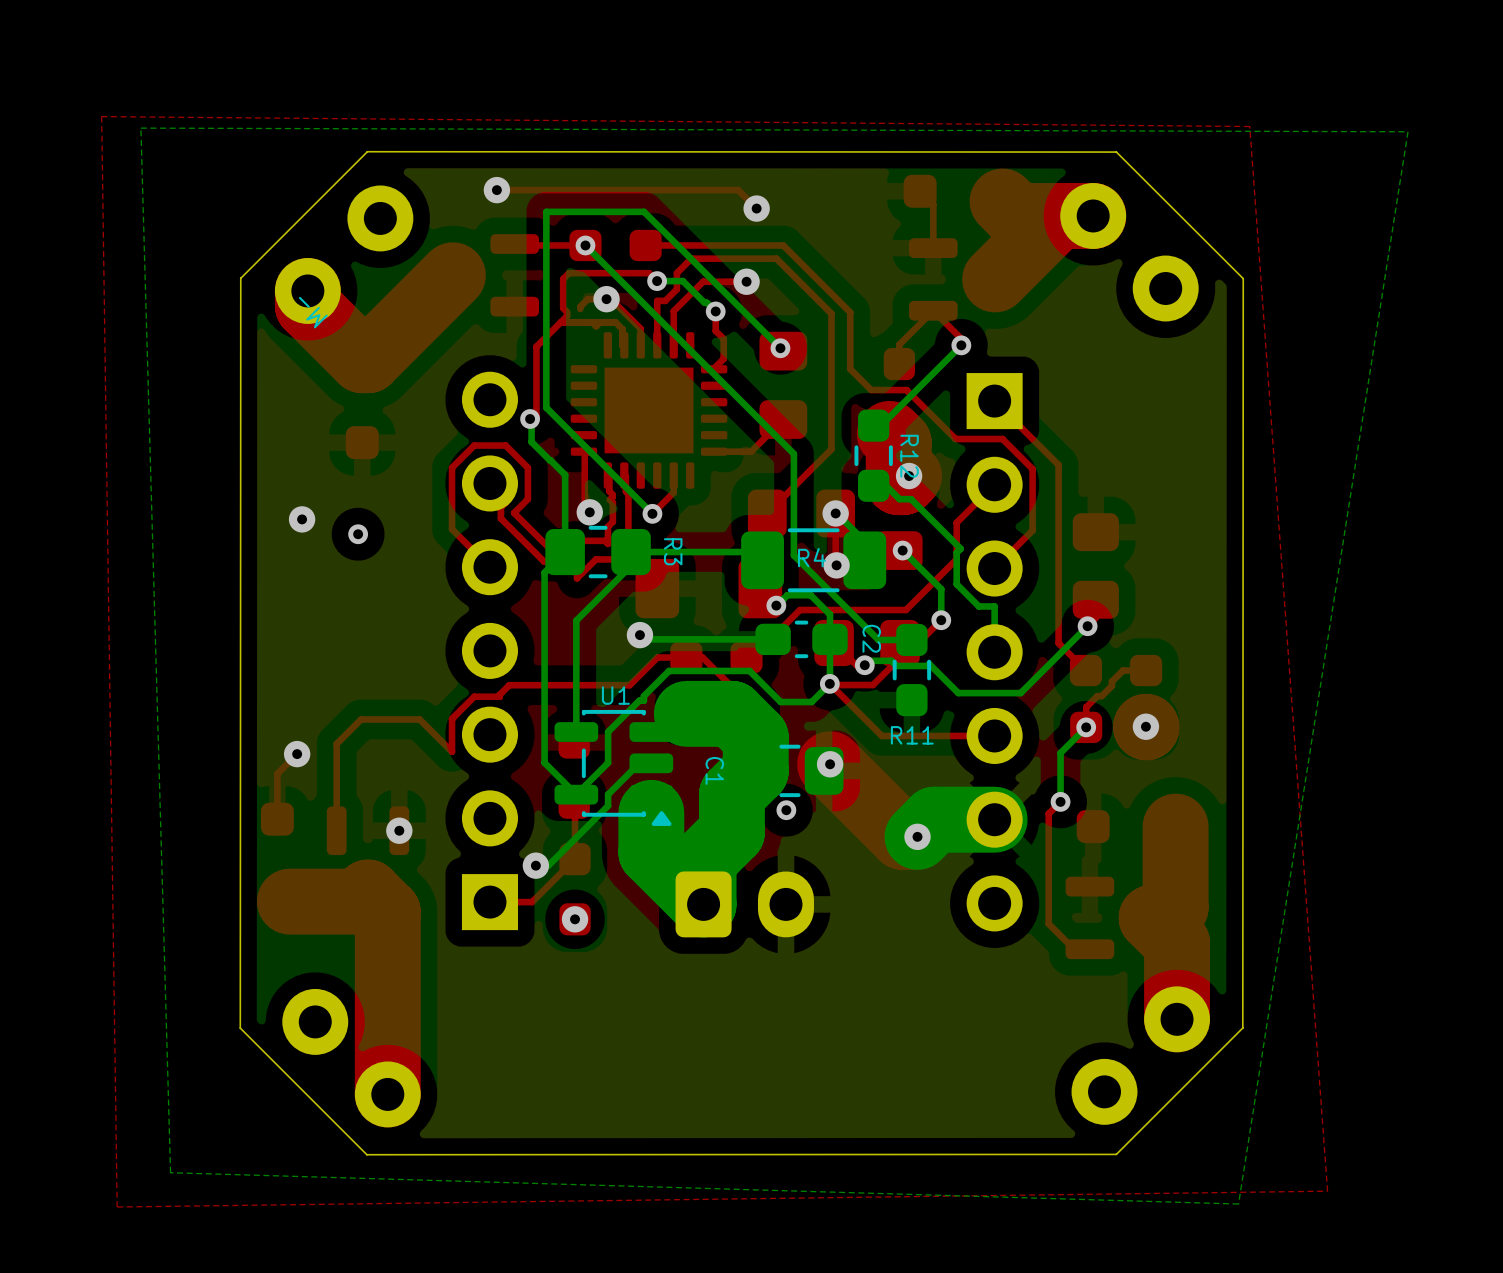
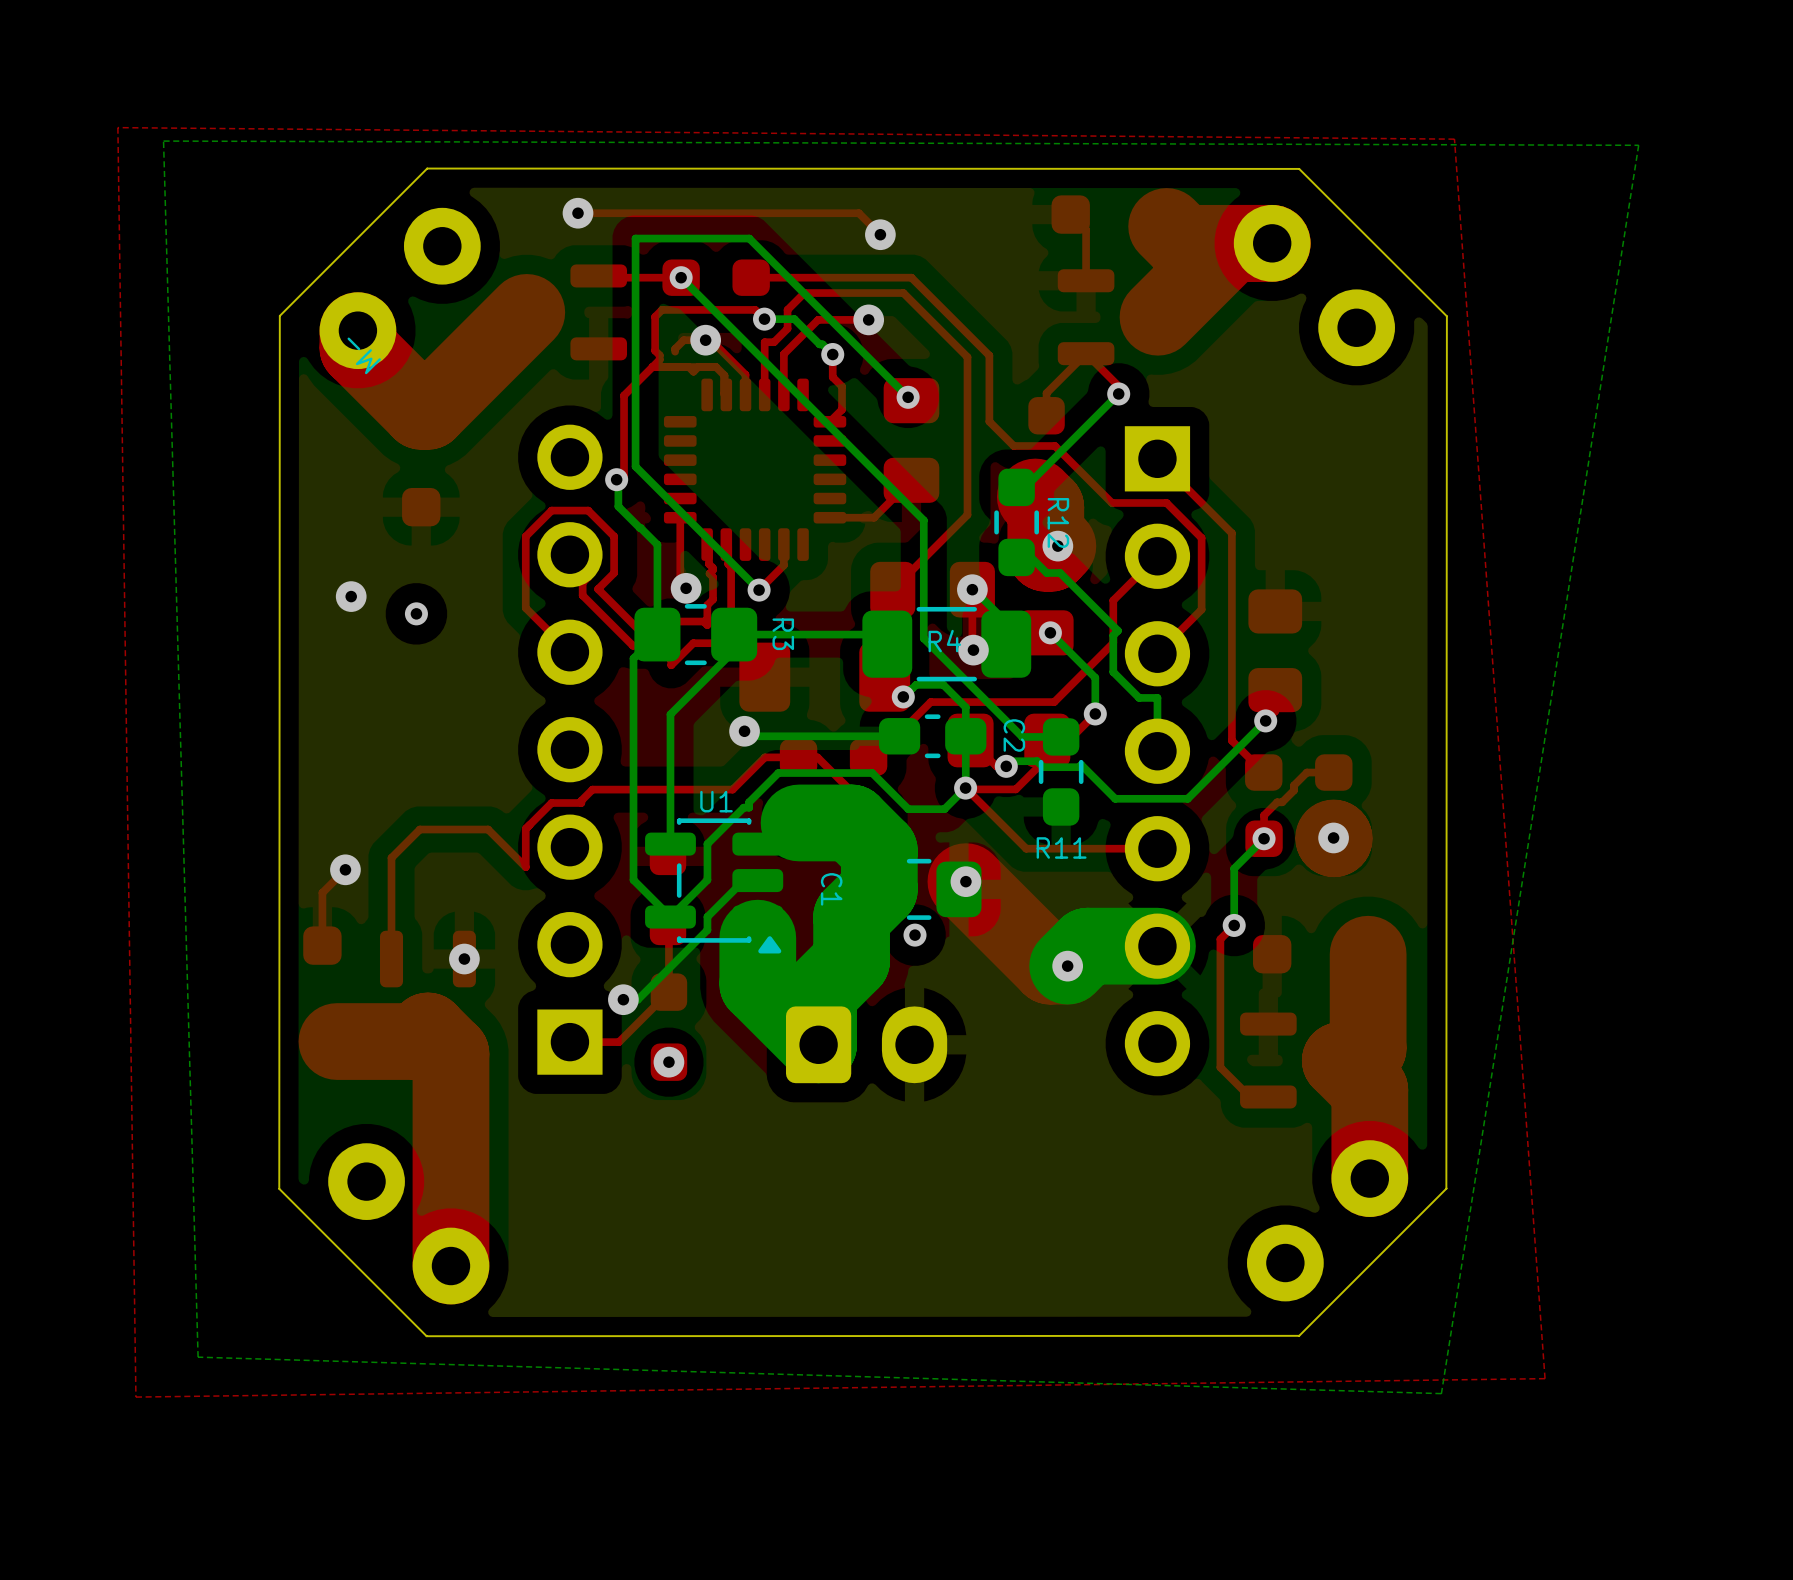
part footprint: [570, 332, 728, 489] -> [663, 378, 847, 561]

